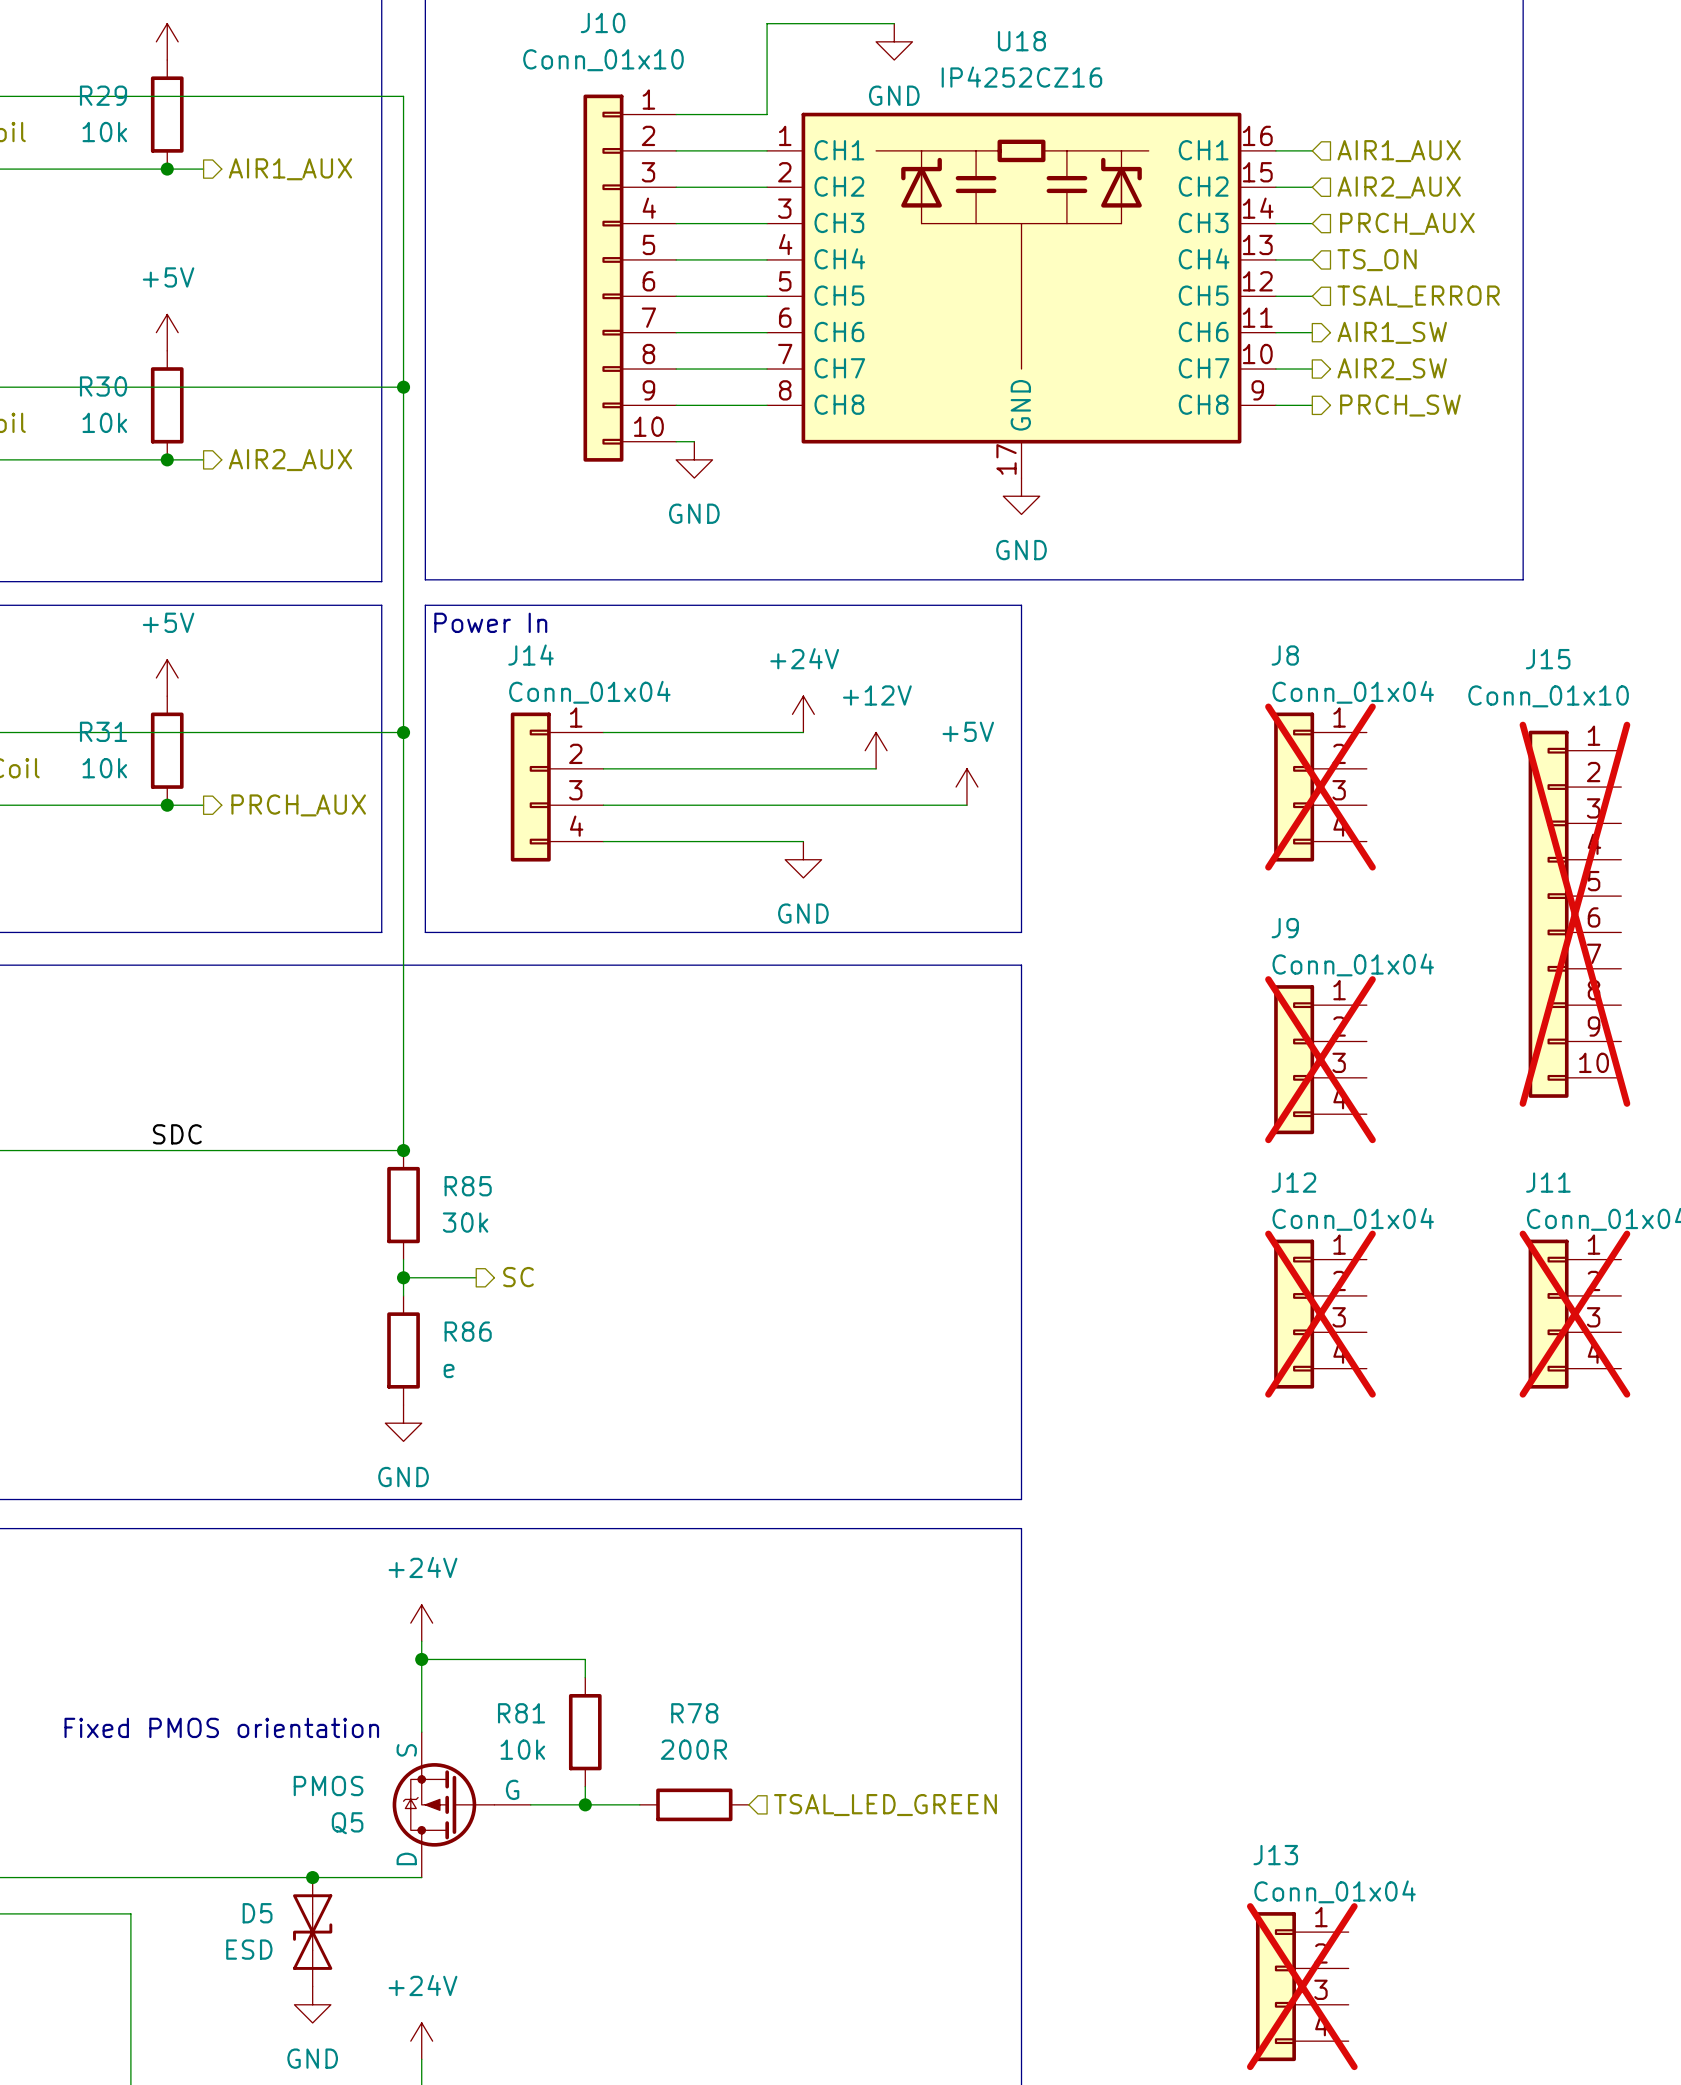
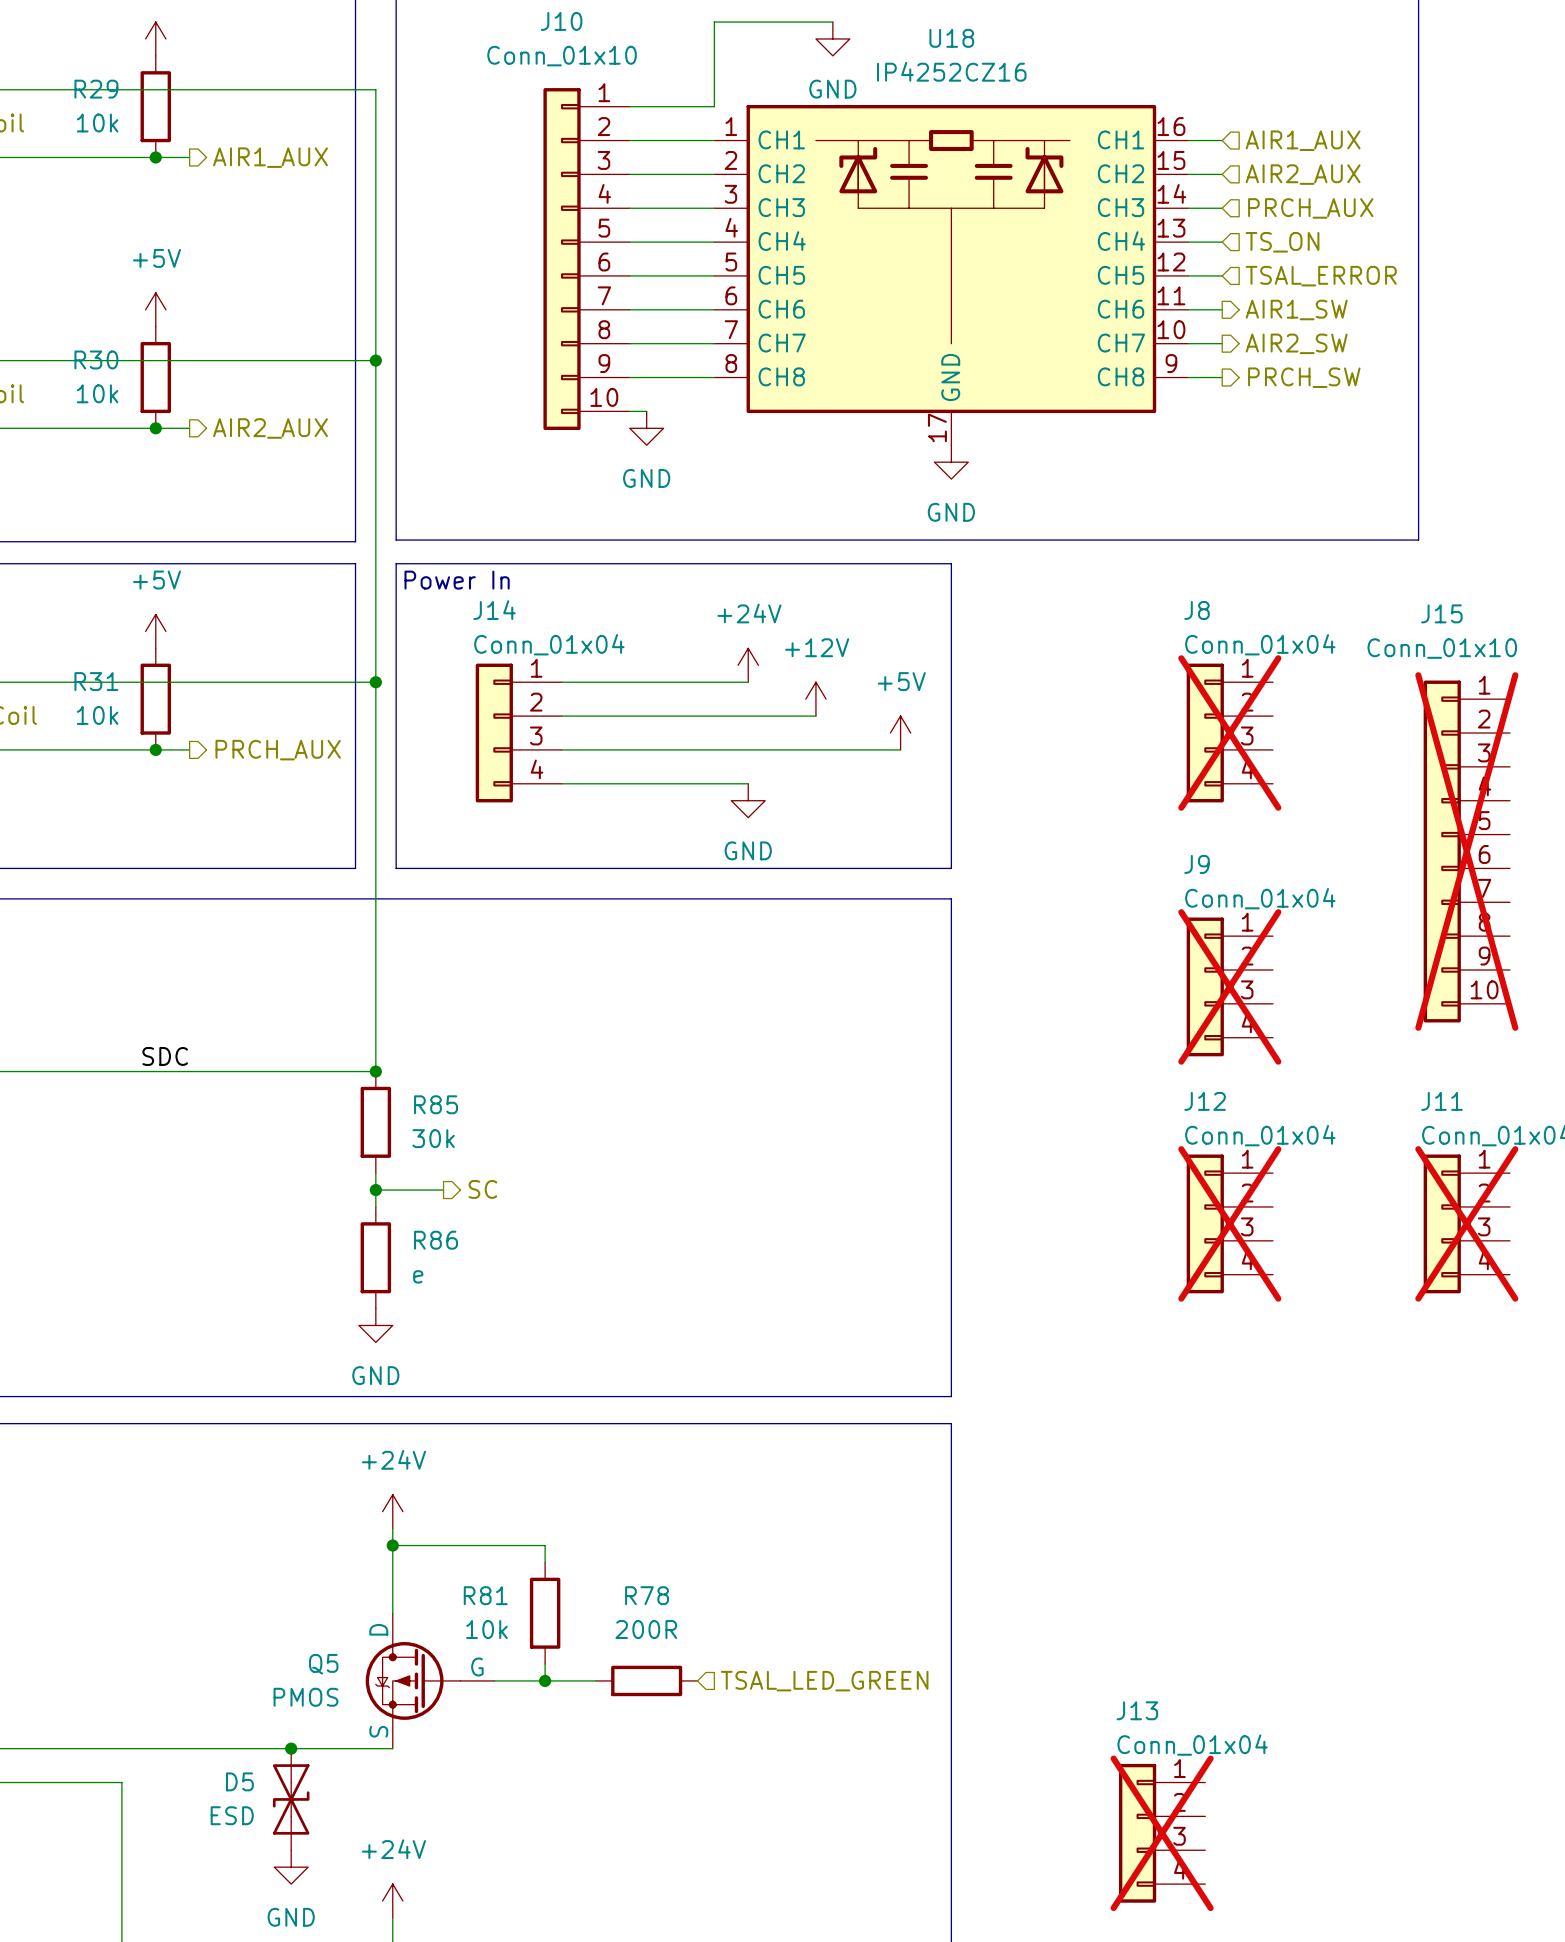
text: Fixed PMOS orientation (221, 1727) -> none
Q5 flip: as is (443, 1804) -> up-down (413, 1680)
J13 position: (1302, 1986) -> (1162, 1833)

